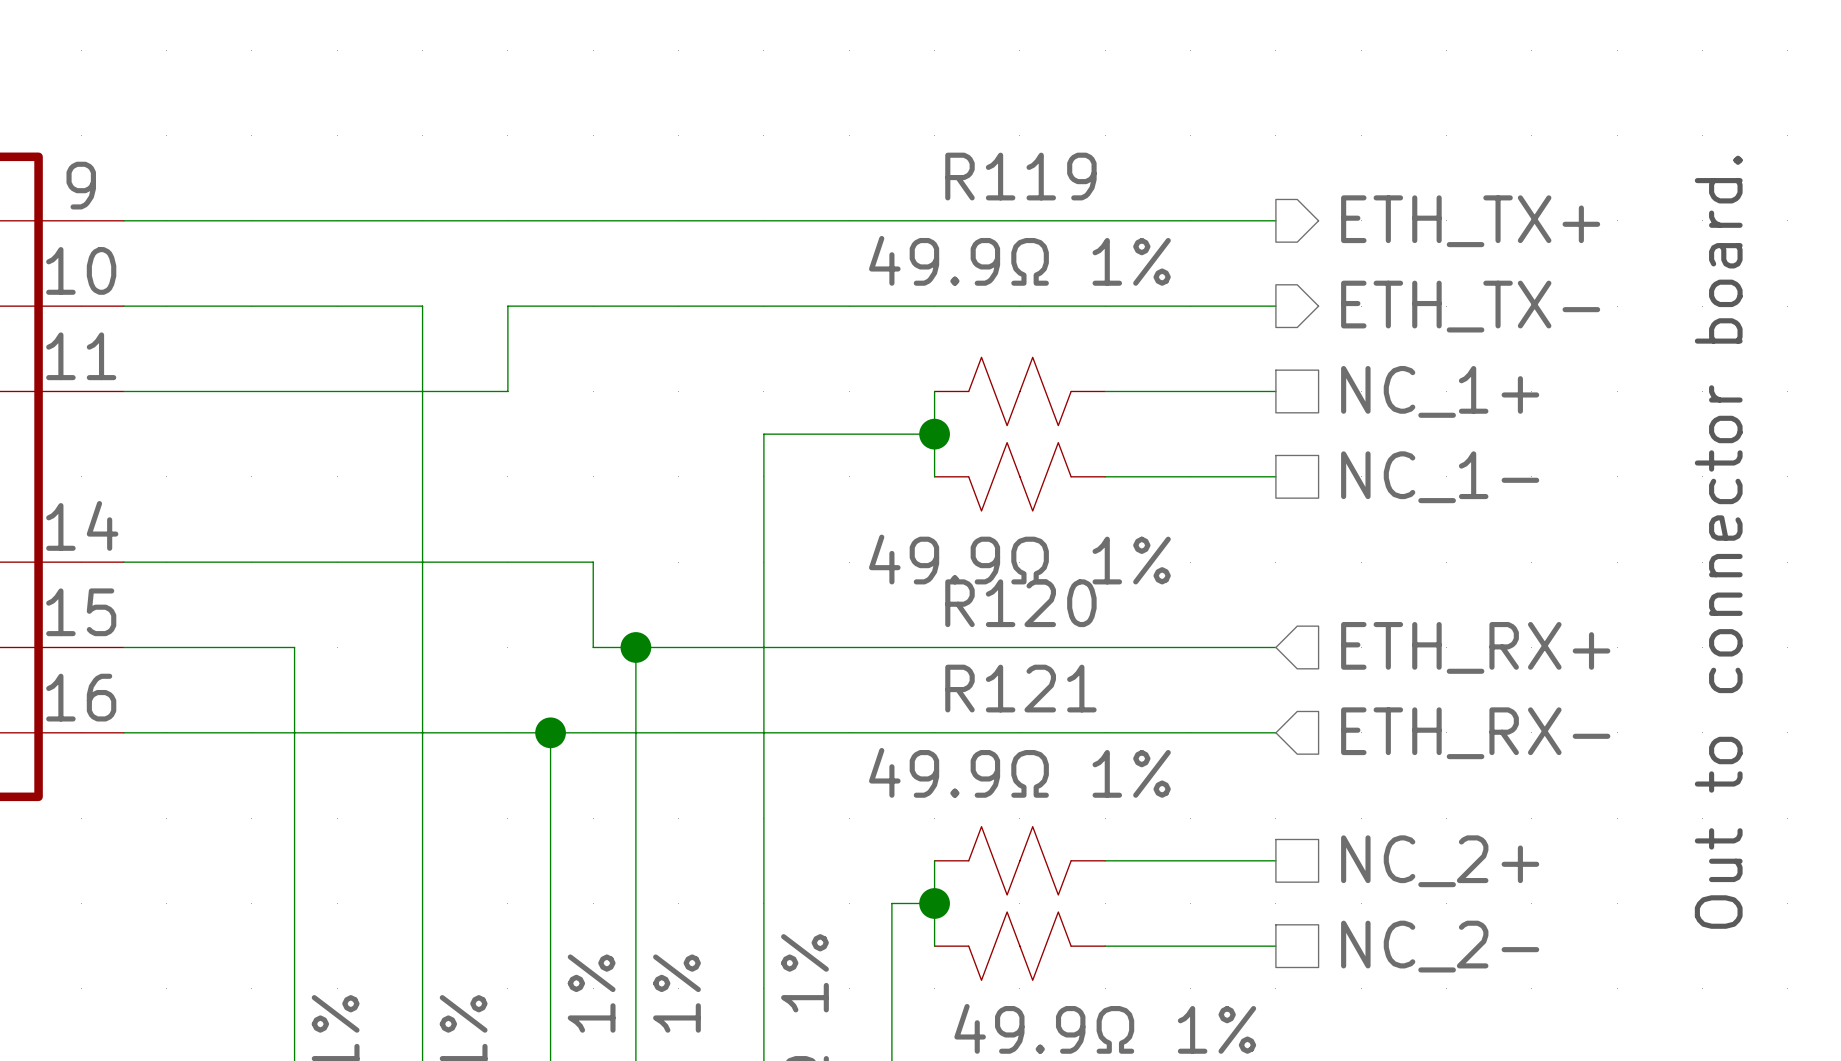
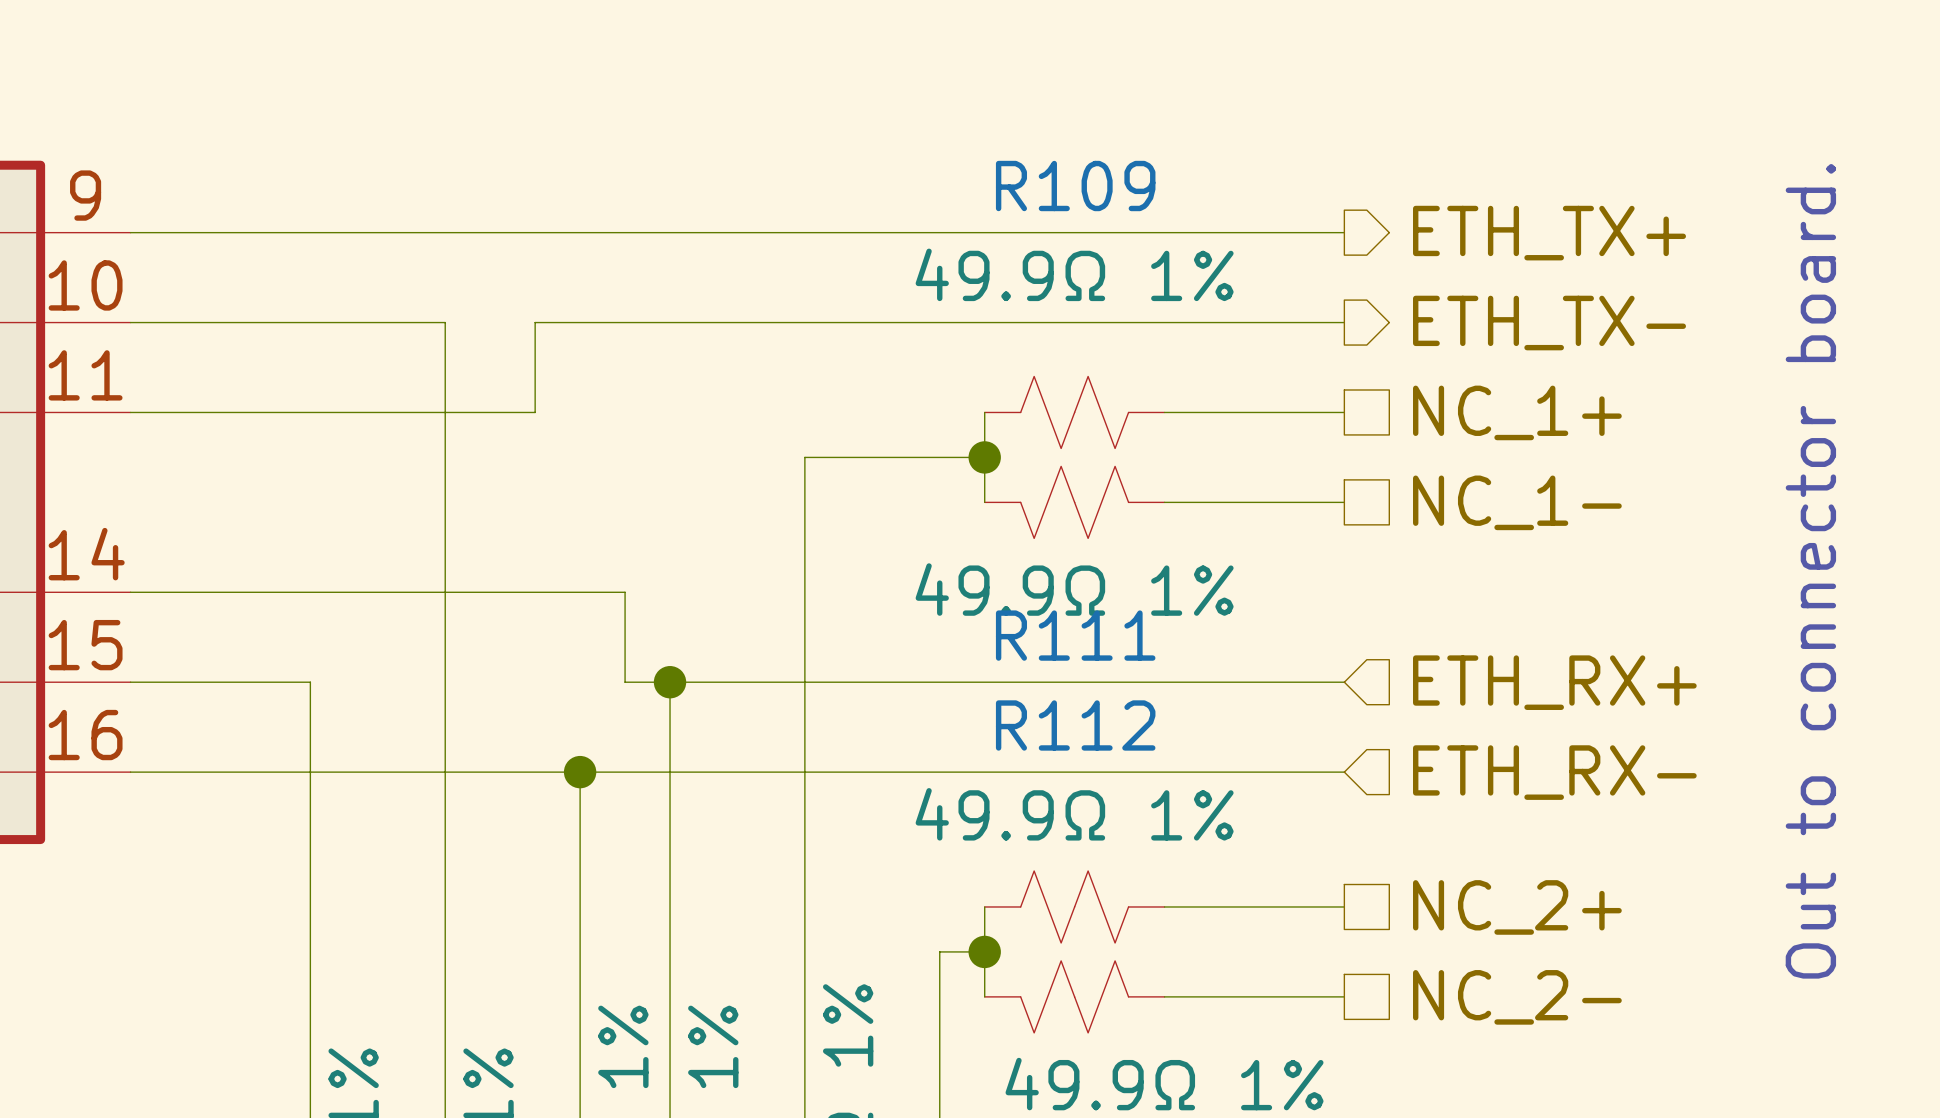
R119 name: R119 (1020, 176) -> R109 (1075, 186)
R120 name: R120 (1020, 603) -> R111 (1075, 635)
R121 name: R121 (1020, 688) -> R112 (1075, 725)

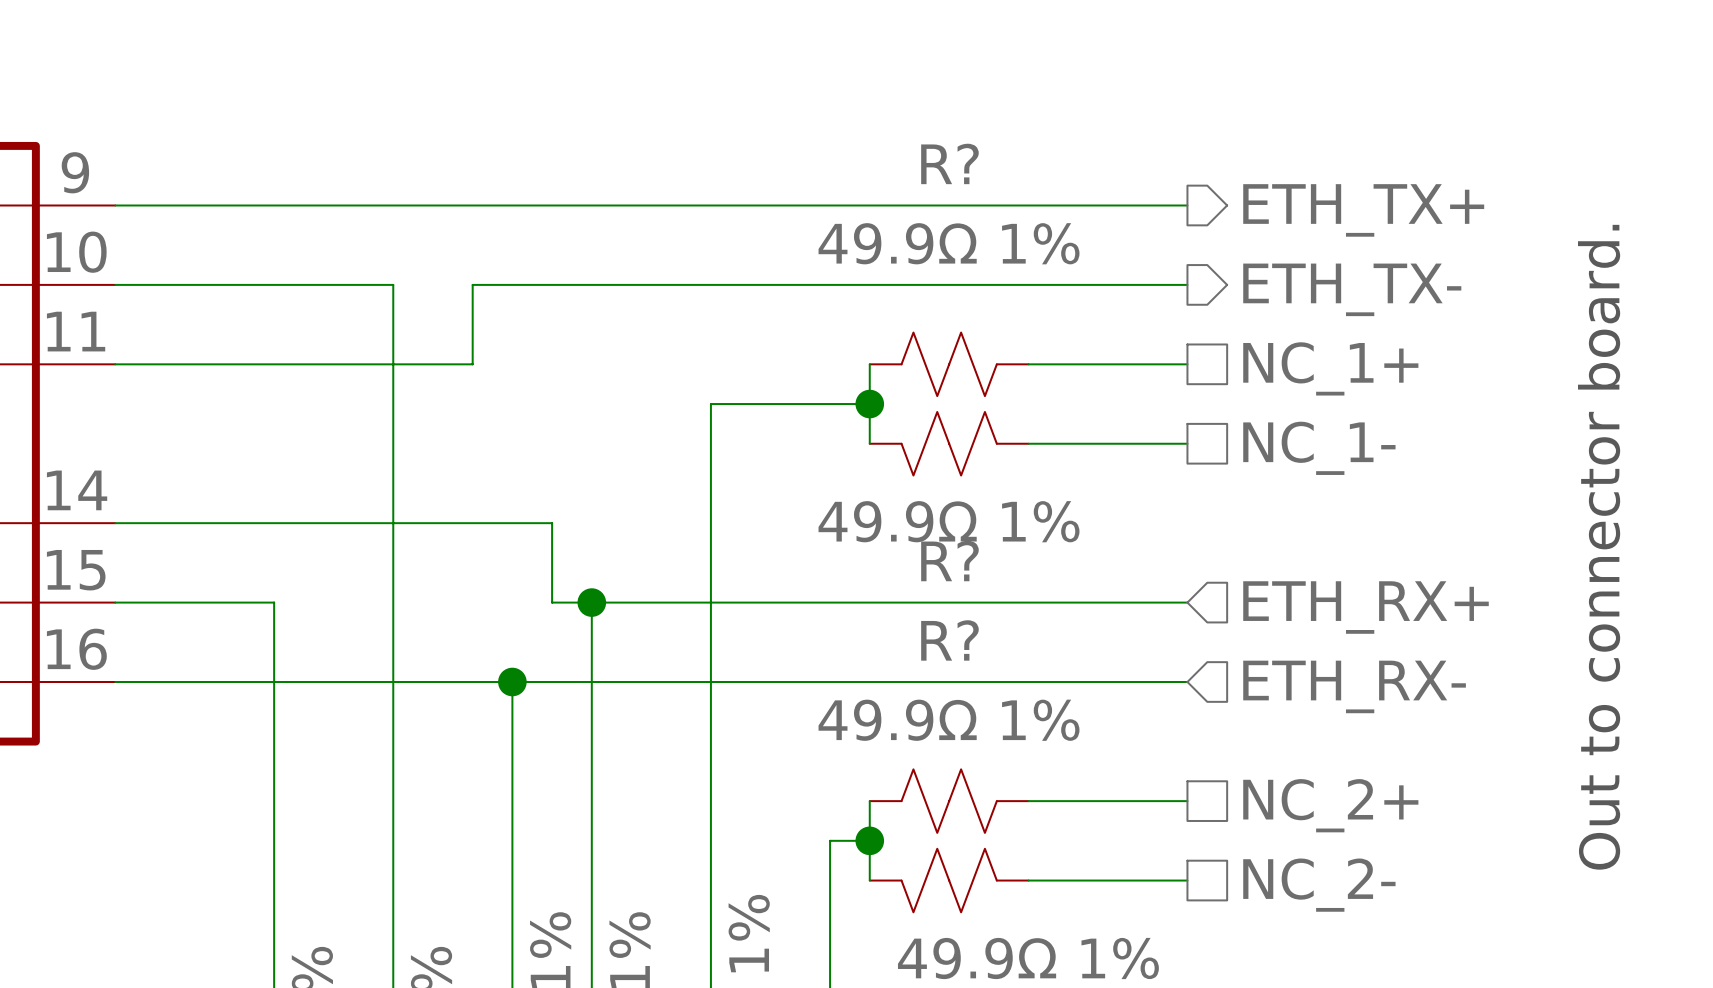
R109 name: R109 (1075, 186) -> R? (949, 163)
R111 name: R111 (1075, 635) -> R? (949, 561)
R112 name: R112 (1075, 725) -> R? (949, 640)

